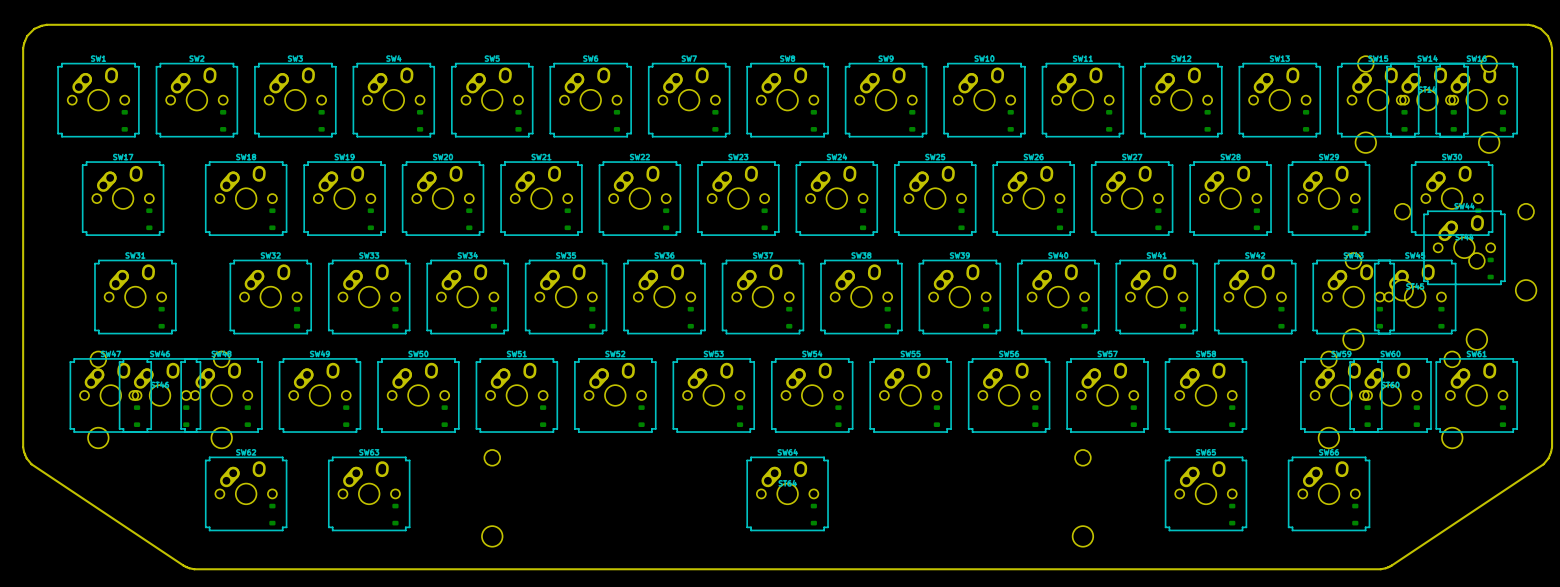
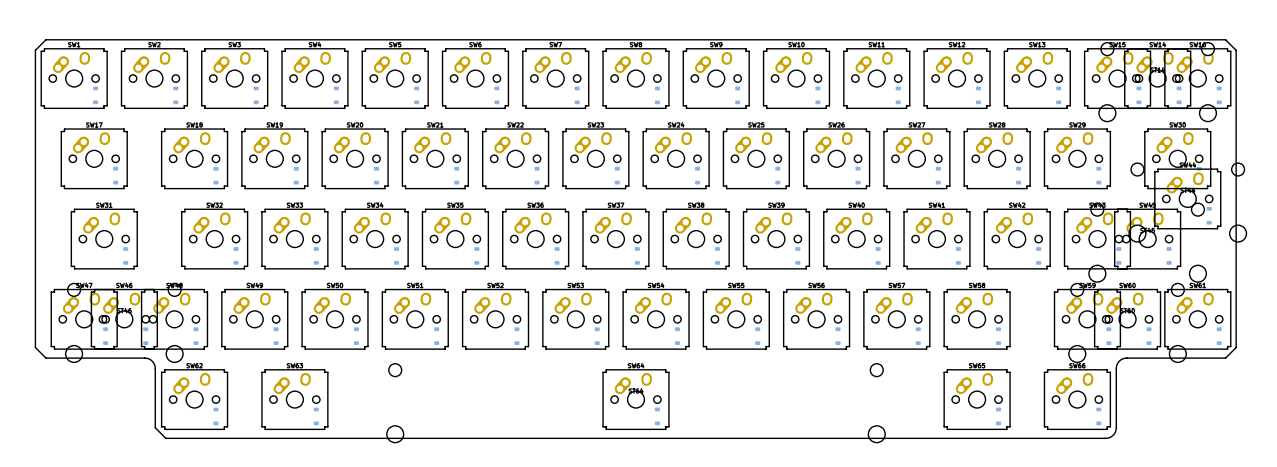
board edge: (46, 24) (34, 28) (27, 36) (23, 48) (24, 452) (31, 464) (189, 568) (1380, 569) (1391, 565) (1543, 464) (1551, 452) (1552, 48) (1548, 36) (1540, 28) (1533, 25) (46, 24) -> none
drawing: none -> [35, 39, 1237, 439]

